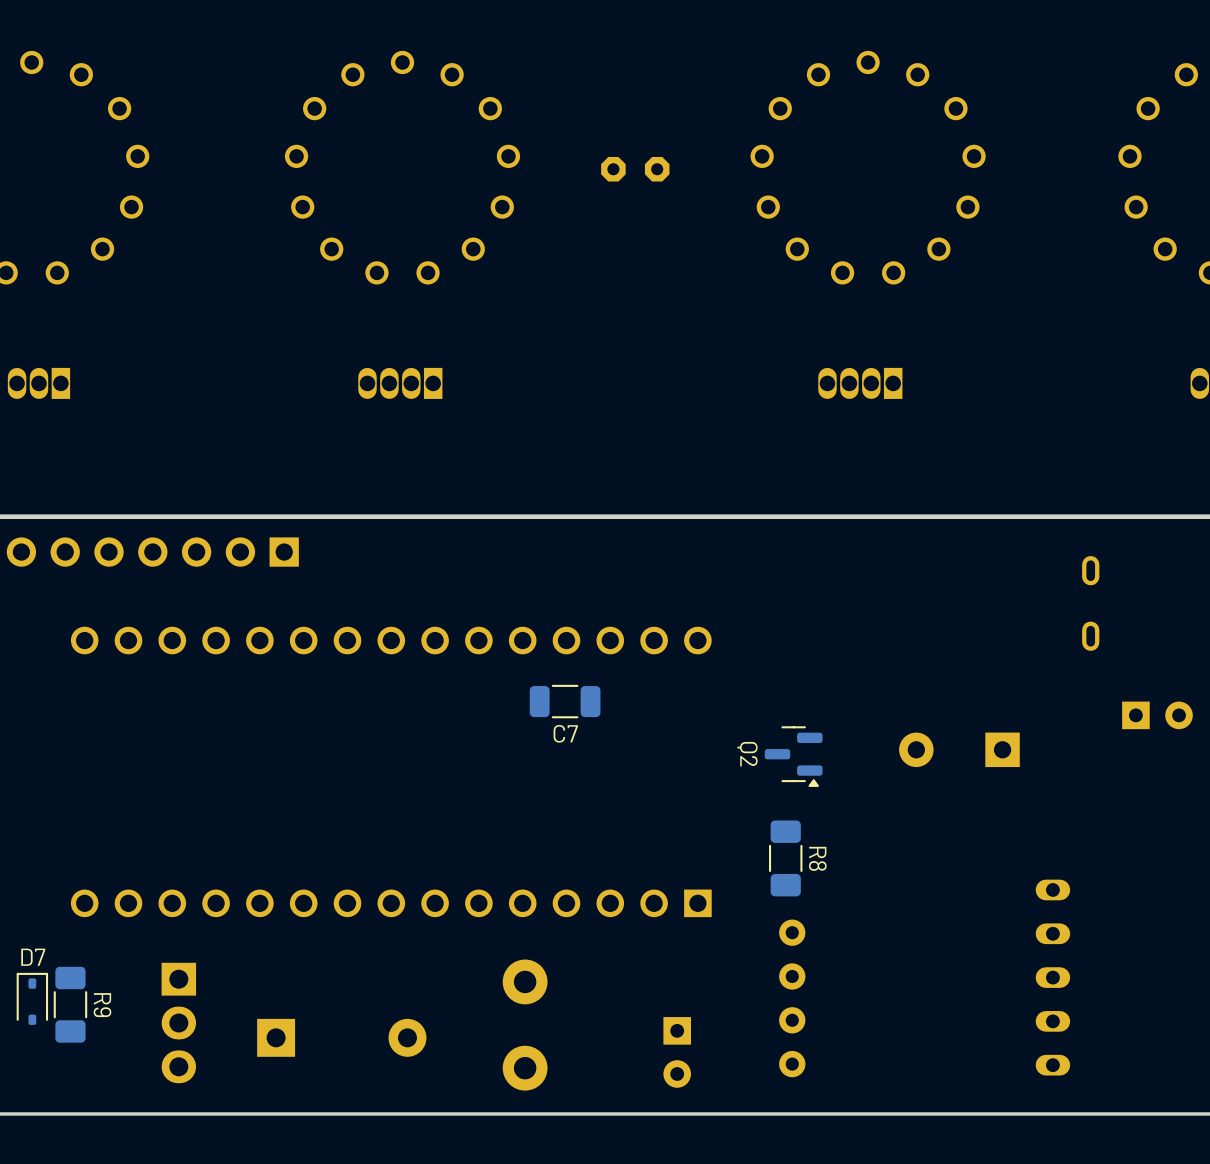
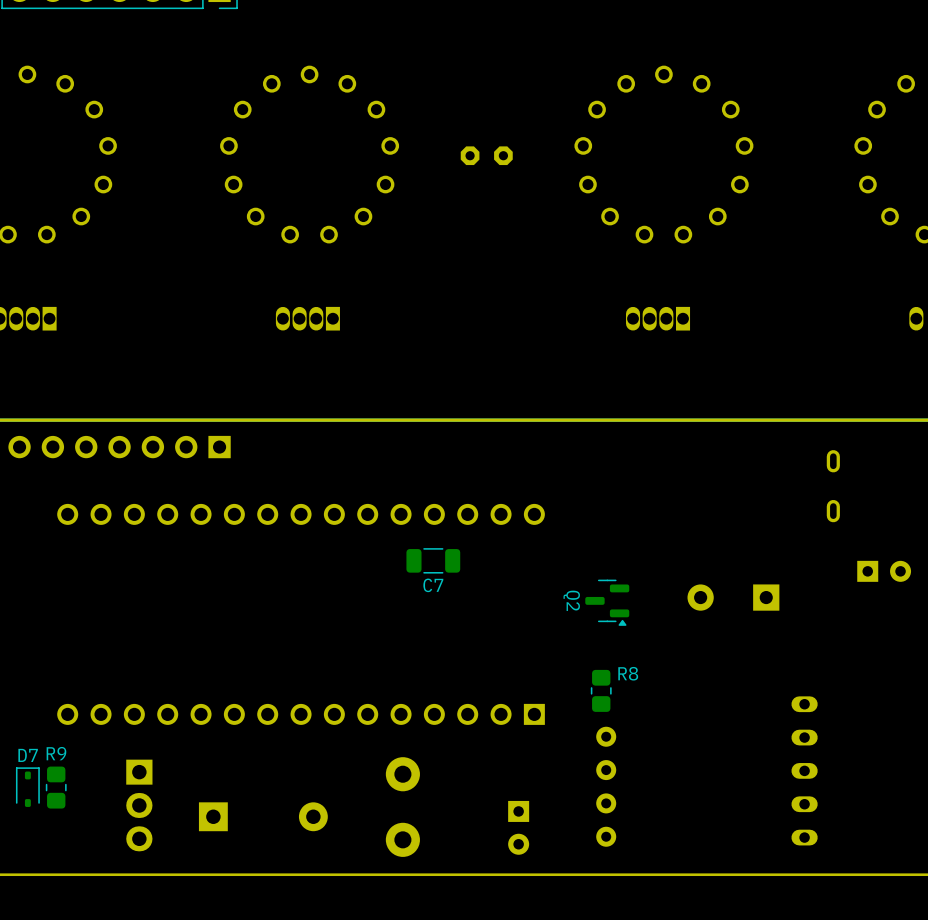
R8 footprint: [769, 820, 803, 897] -> [590, 669, 612, 712]
R9 footprint: [53, 966, 88, 1043] -> [45, 766, 67, 809]
R9 name rotation: 0° (102, 1005) -> 90° counterclockwise (56, 753)
R9 name position: R9 (102, 1005) -> R9 (56, 753)

